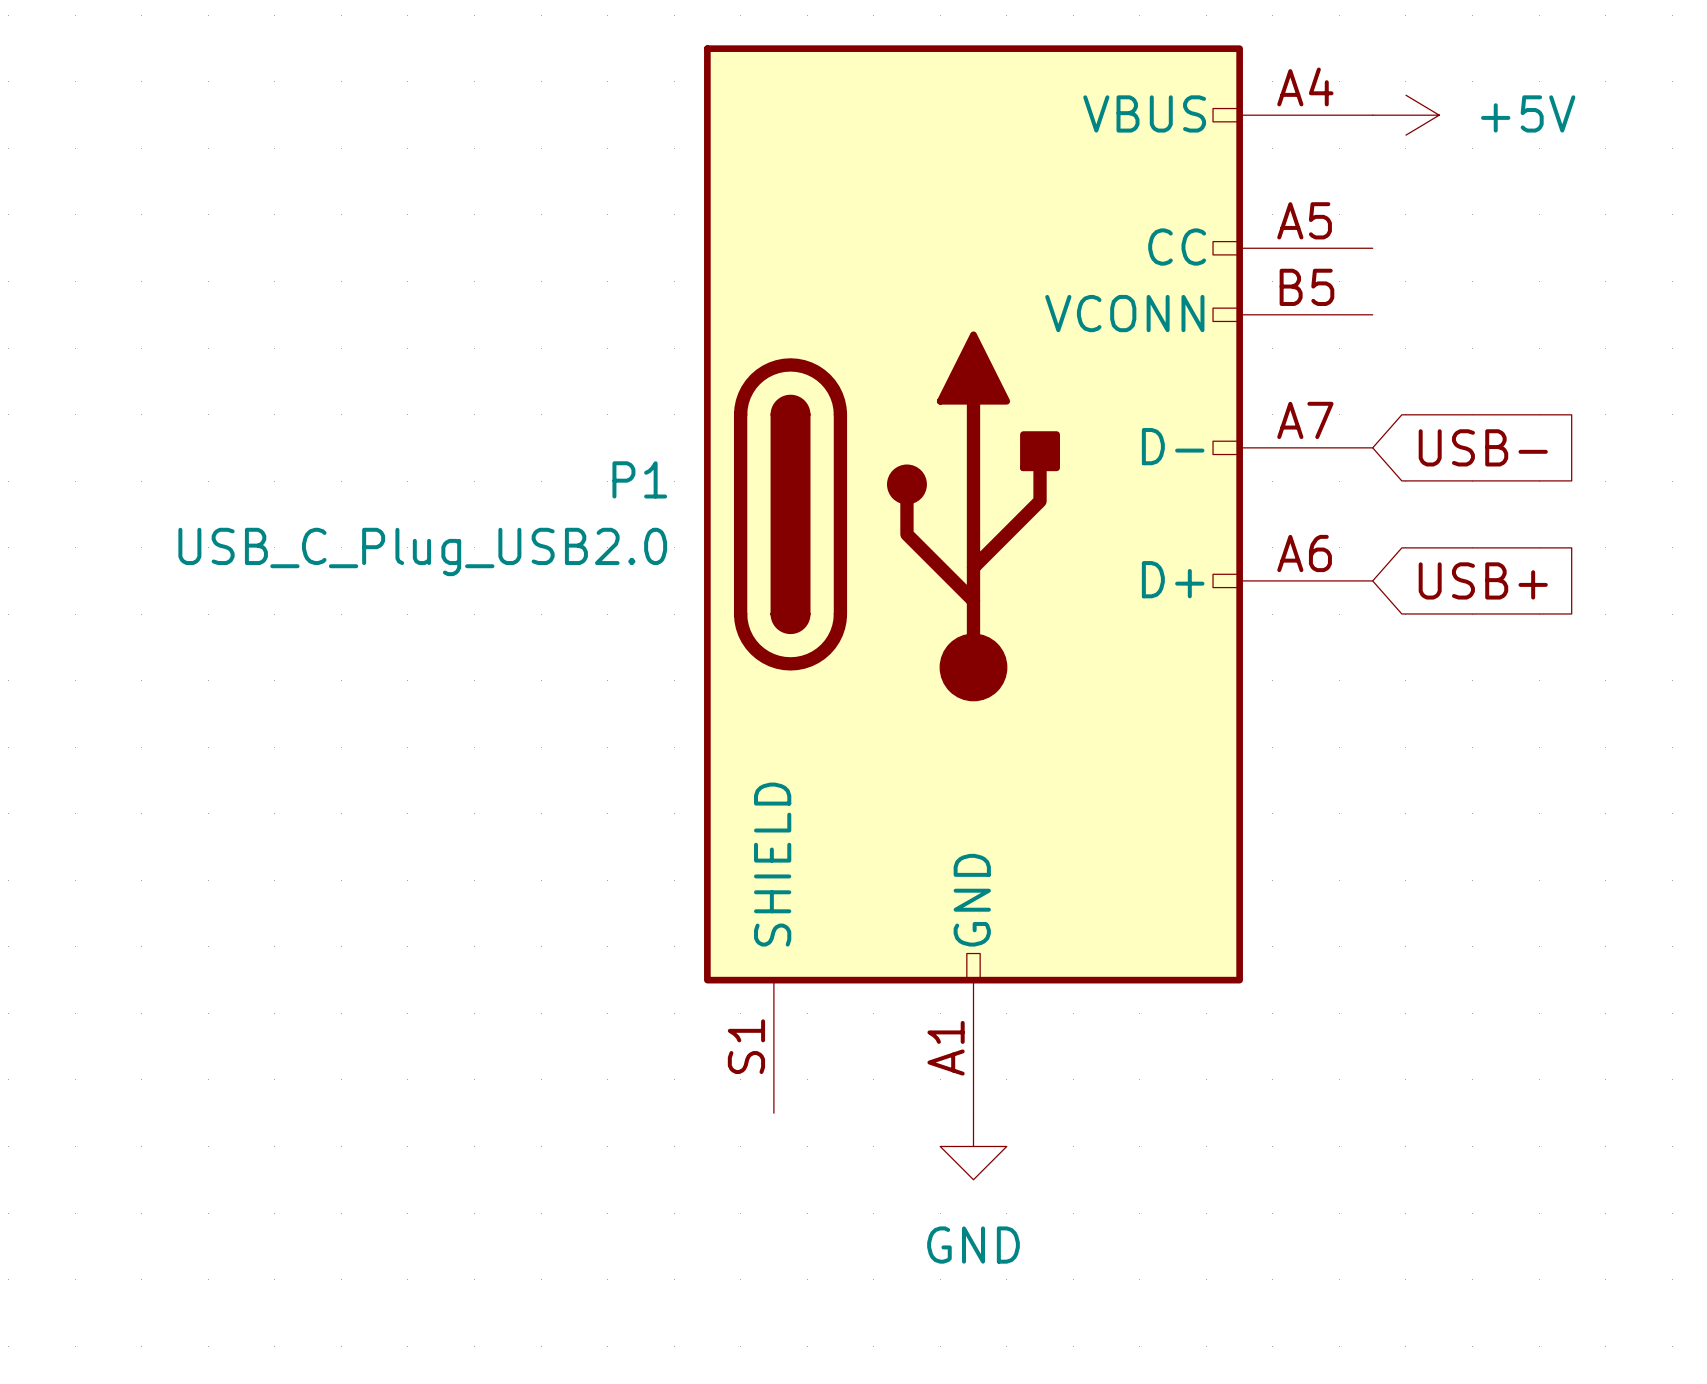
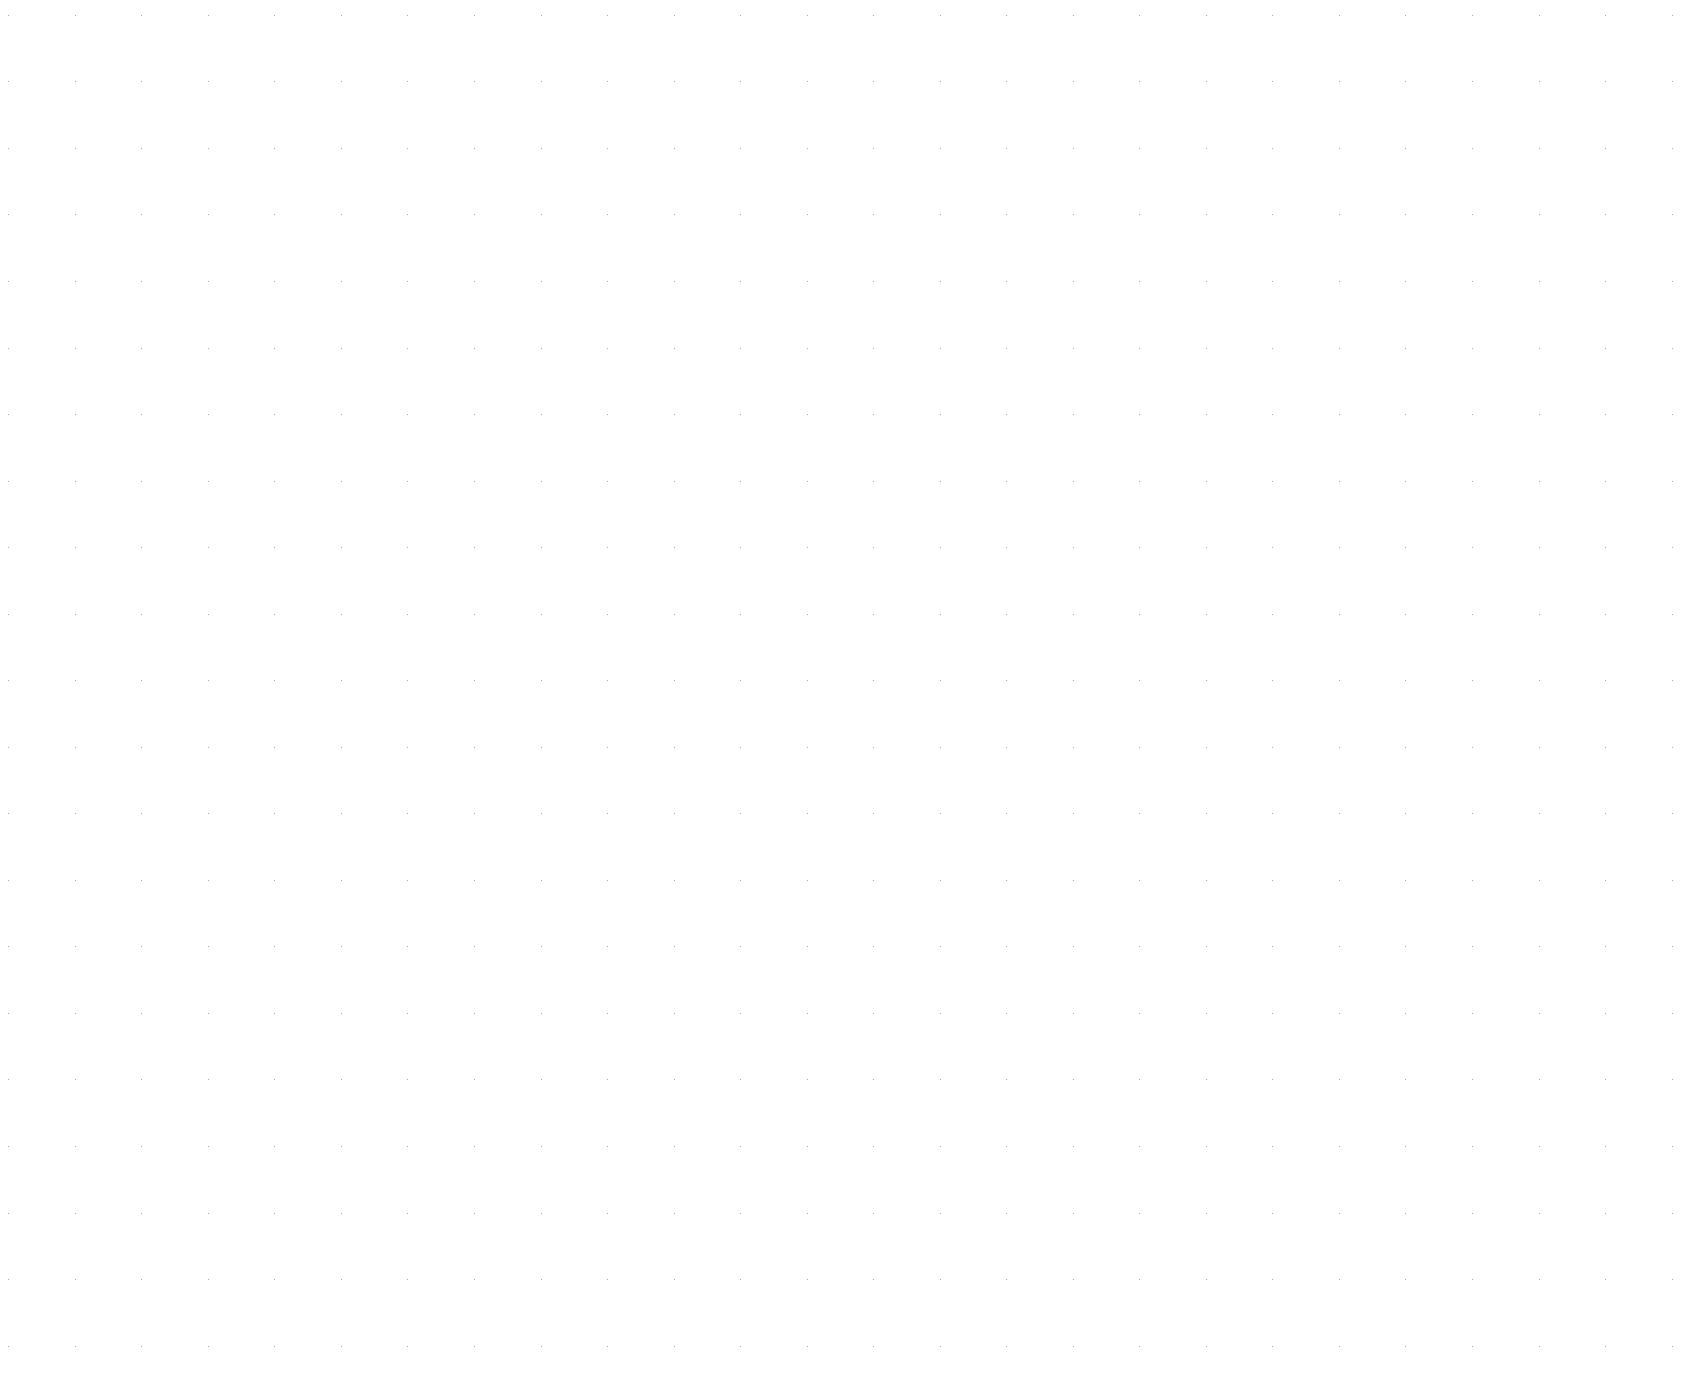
power symbol: +5V (1405, 115) -> none
global label: USB- (1483, 447) -> none
P1: USB_C_Plug_USB2.0 (1038, 579) -> none
global label: USB+ (1483, 580) -> none
power symbol: GND (973, 1146) -> none

